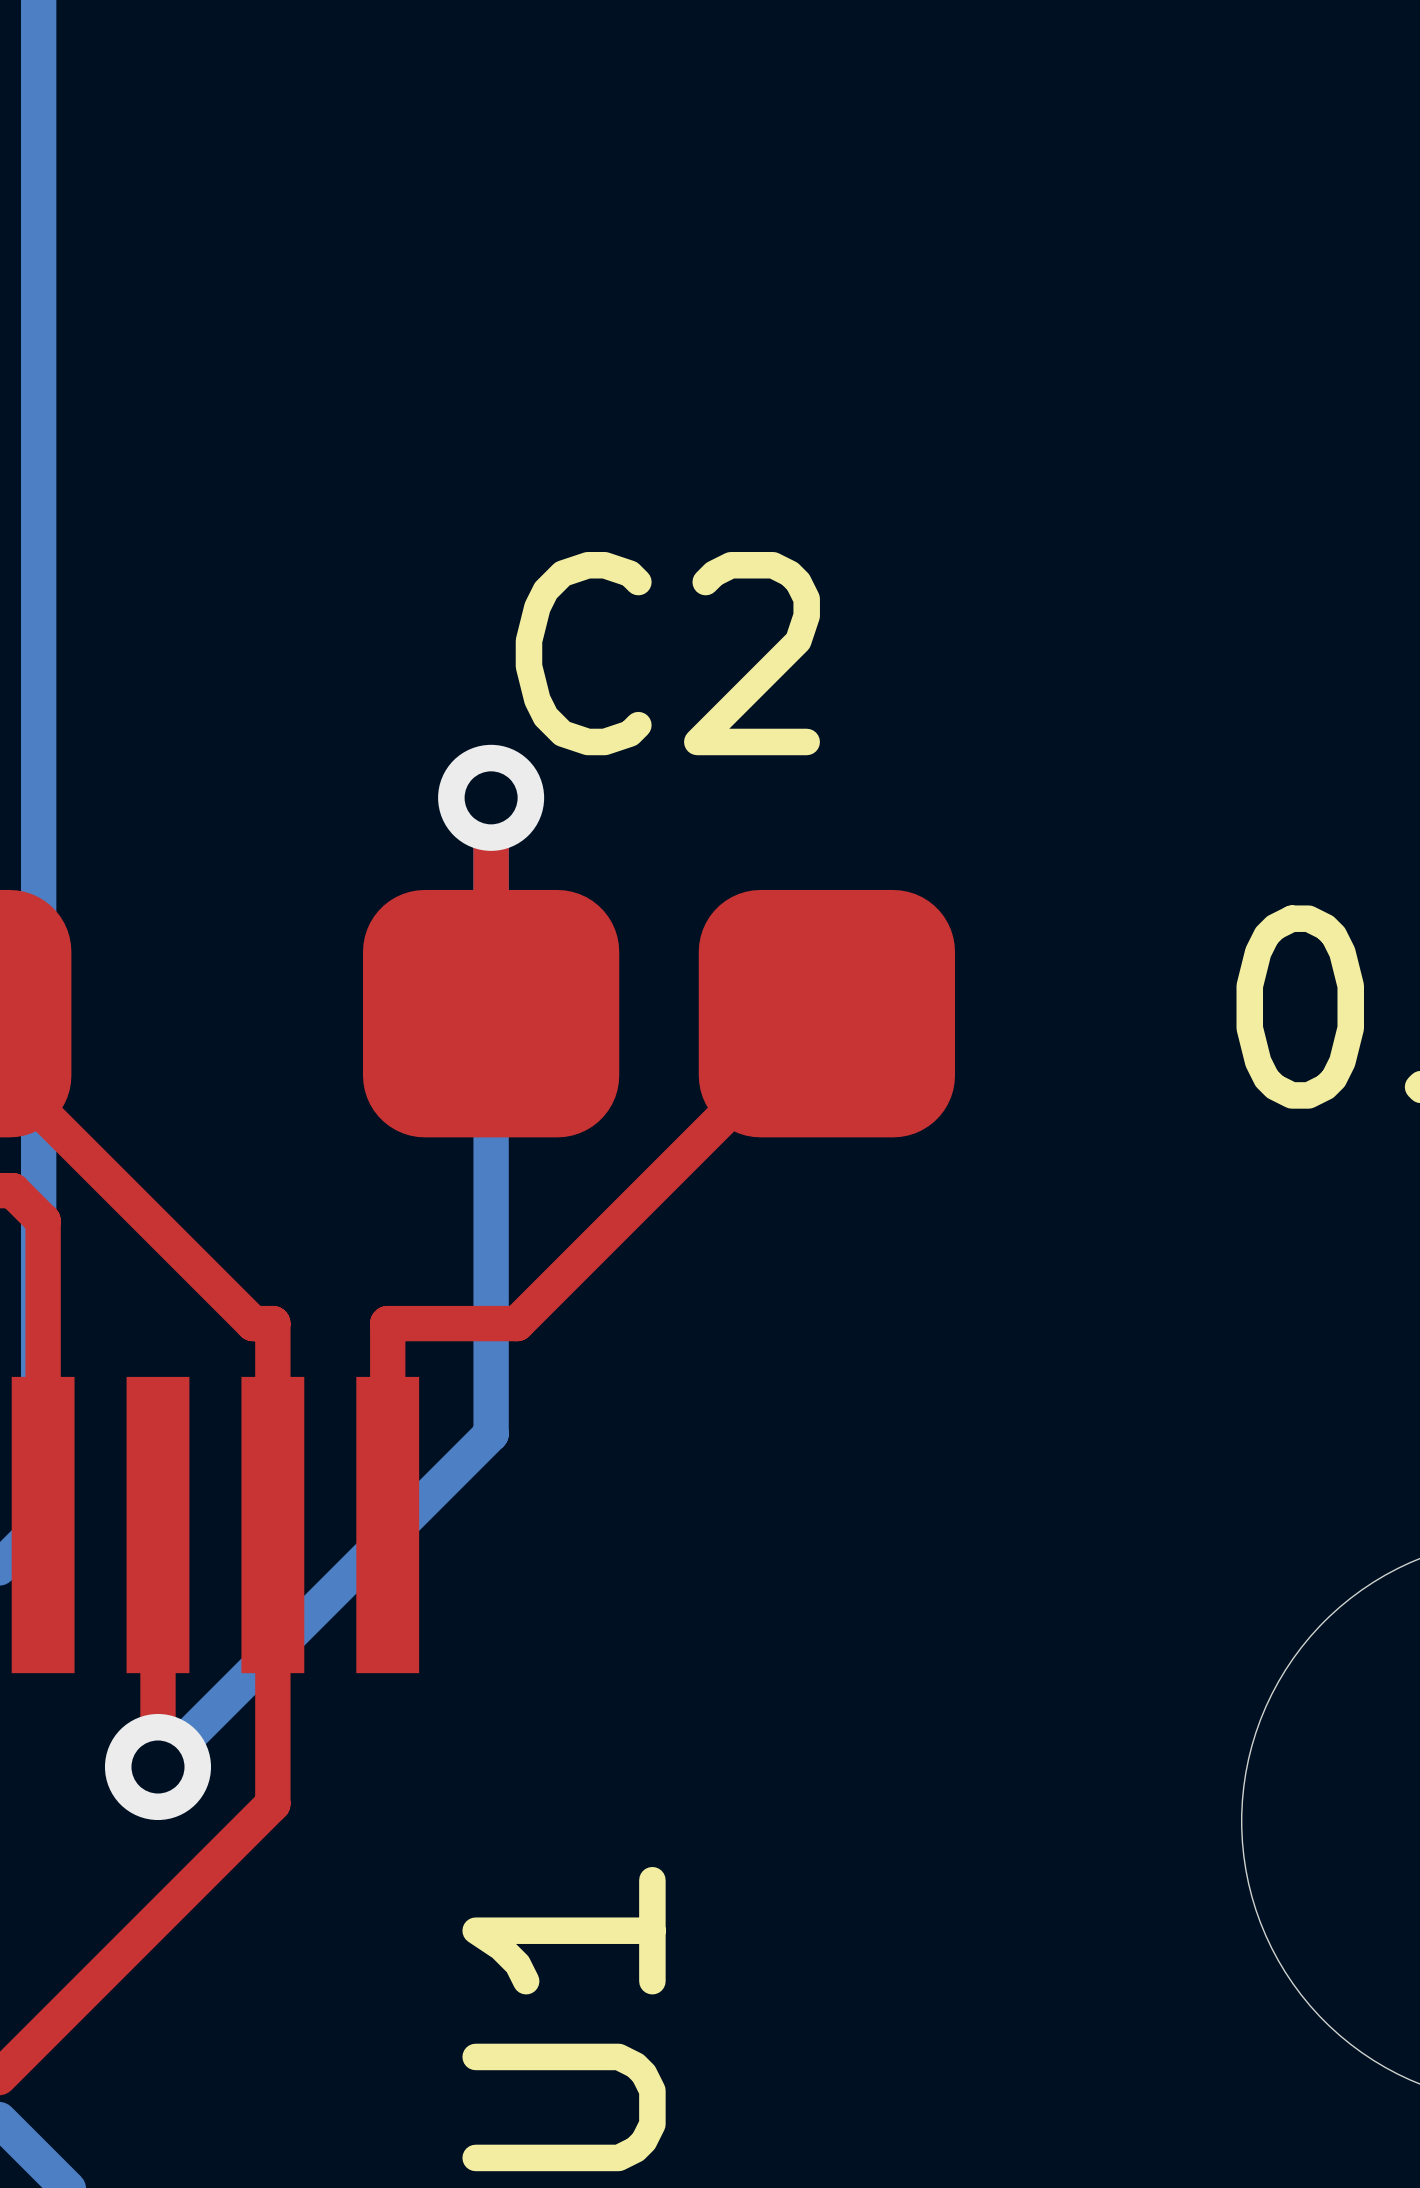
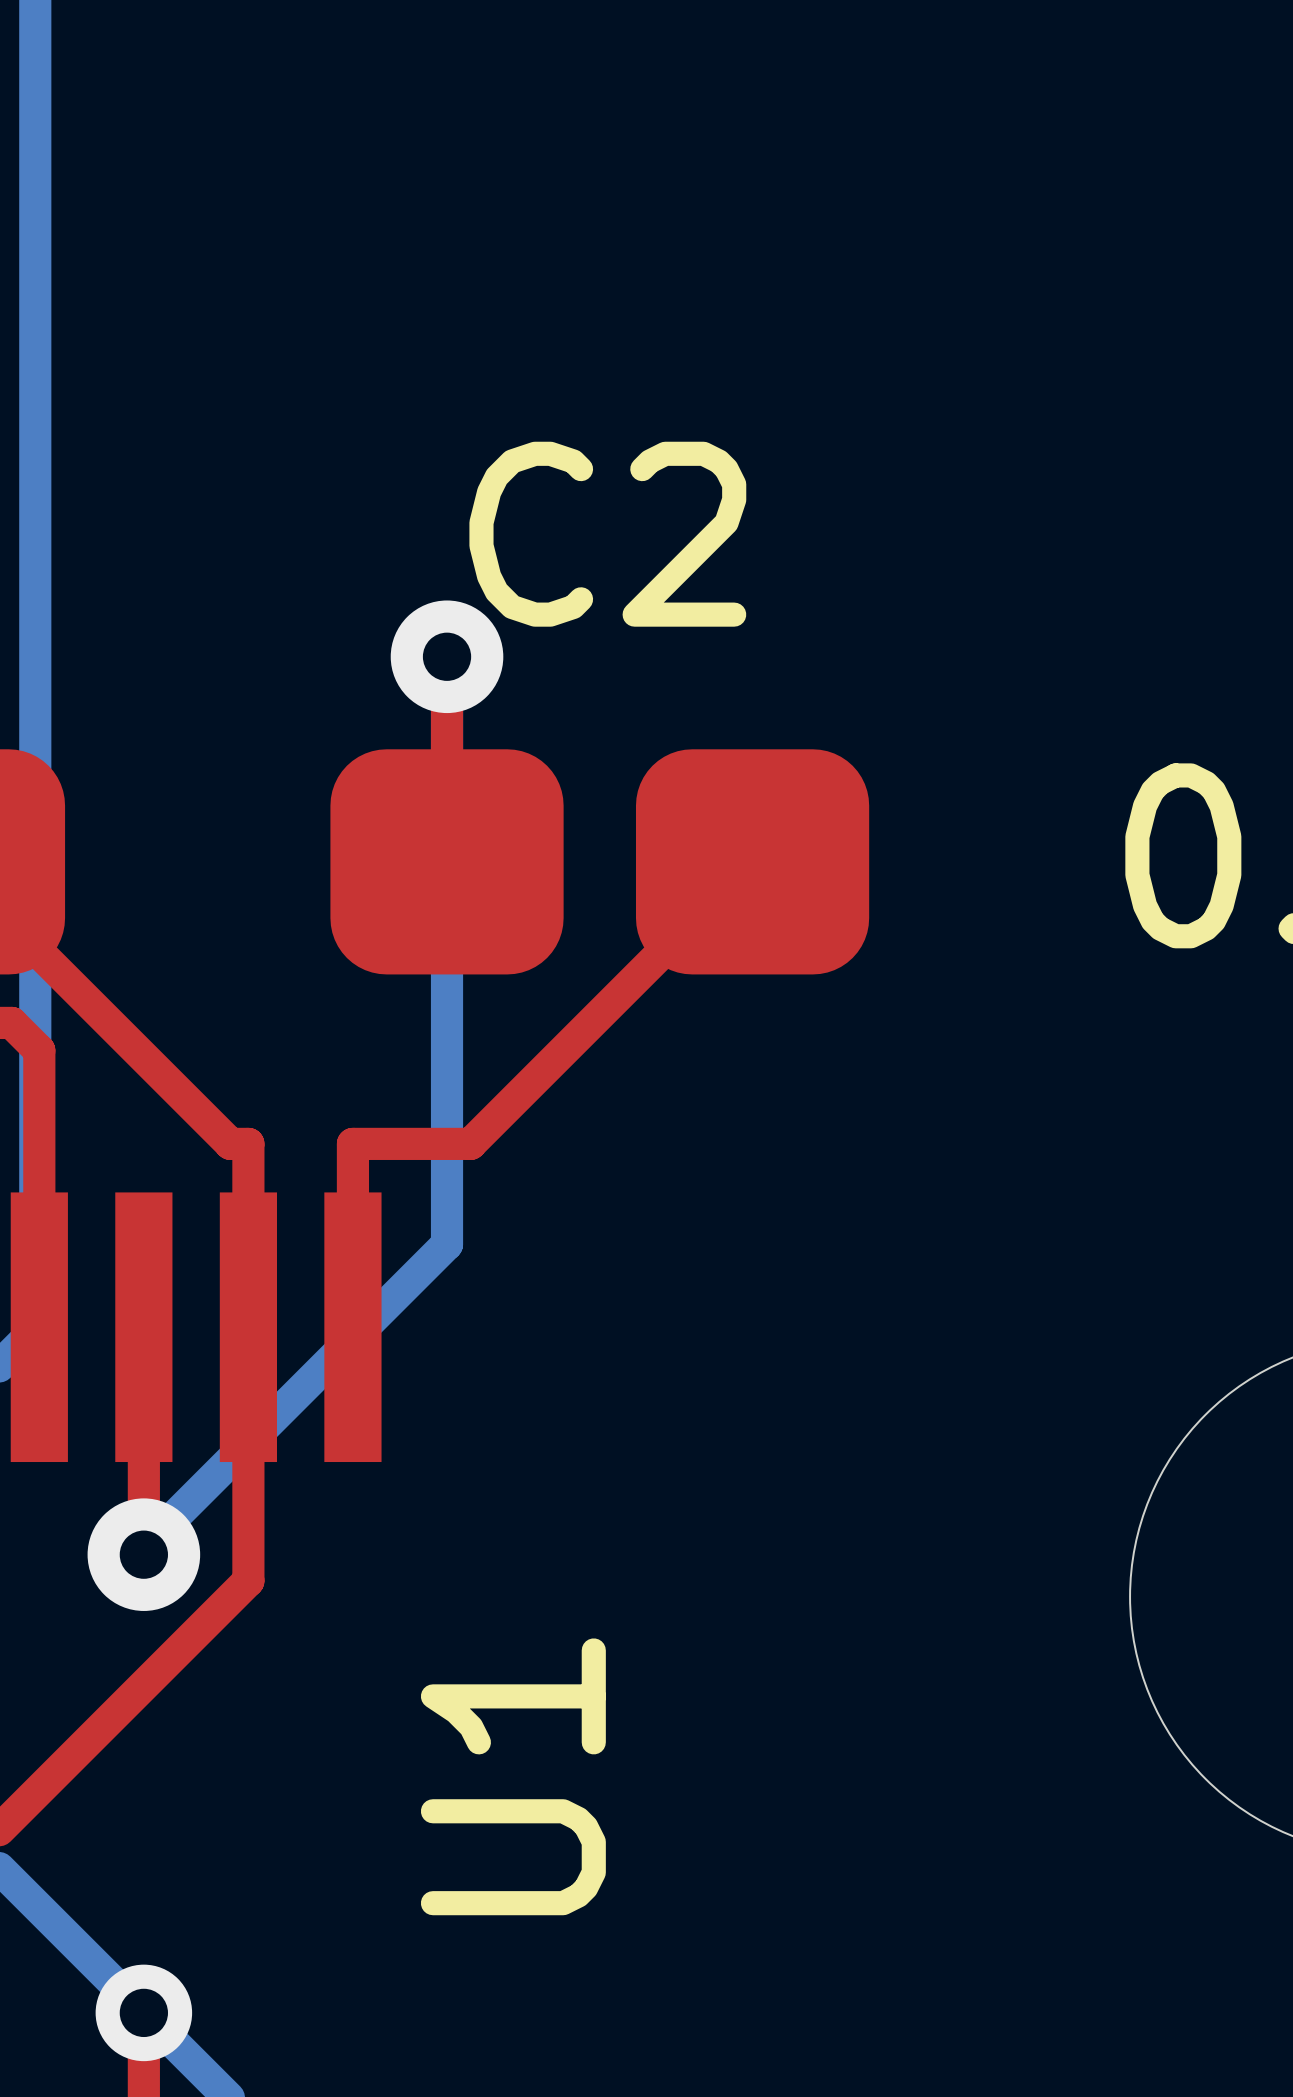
via size: [438, 744, 545, 851] -> [390, 600, 504, 714]
via size: [104, 1713, 212, 1821] -> [87, 1498, 201, 1611]

